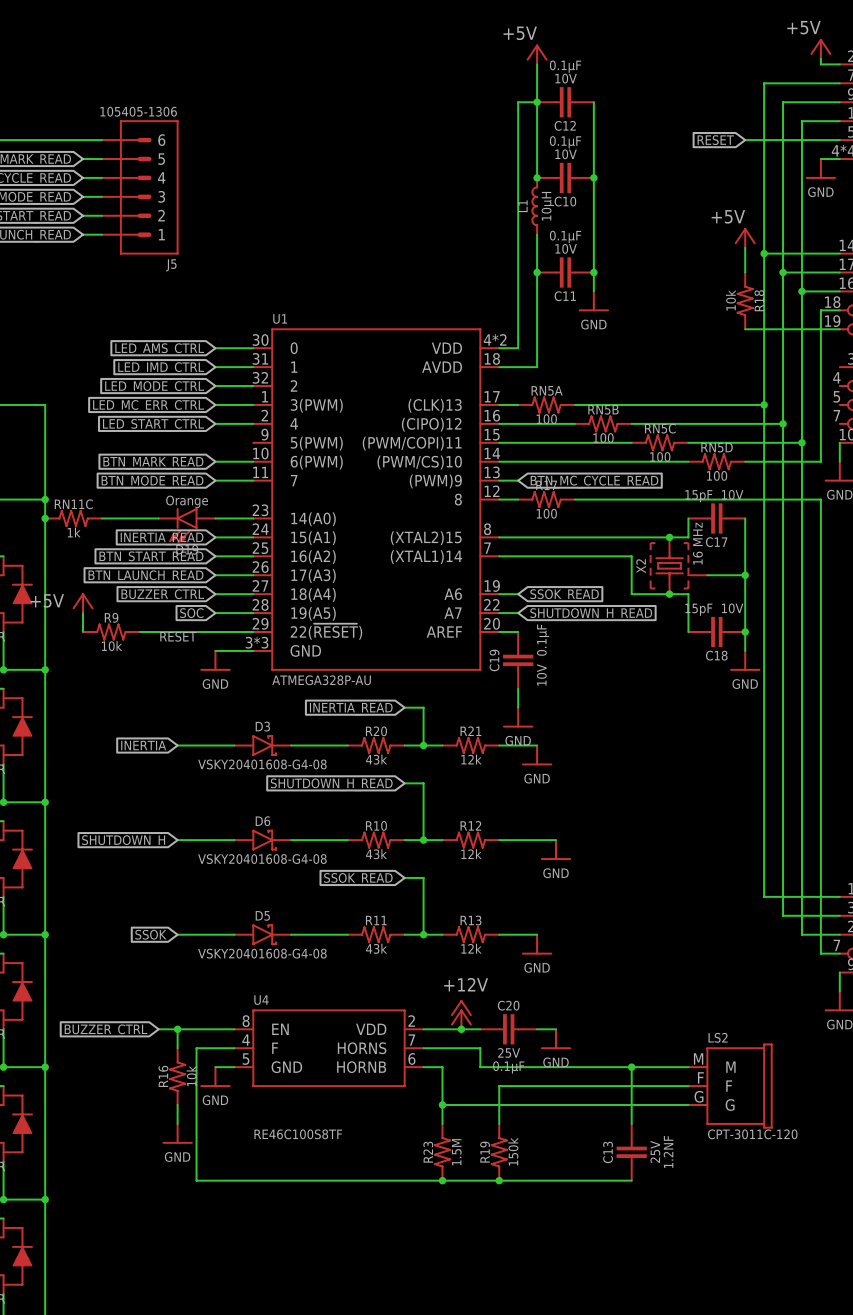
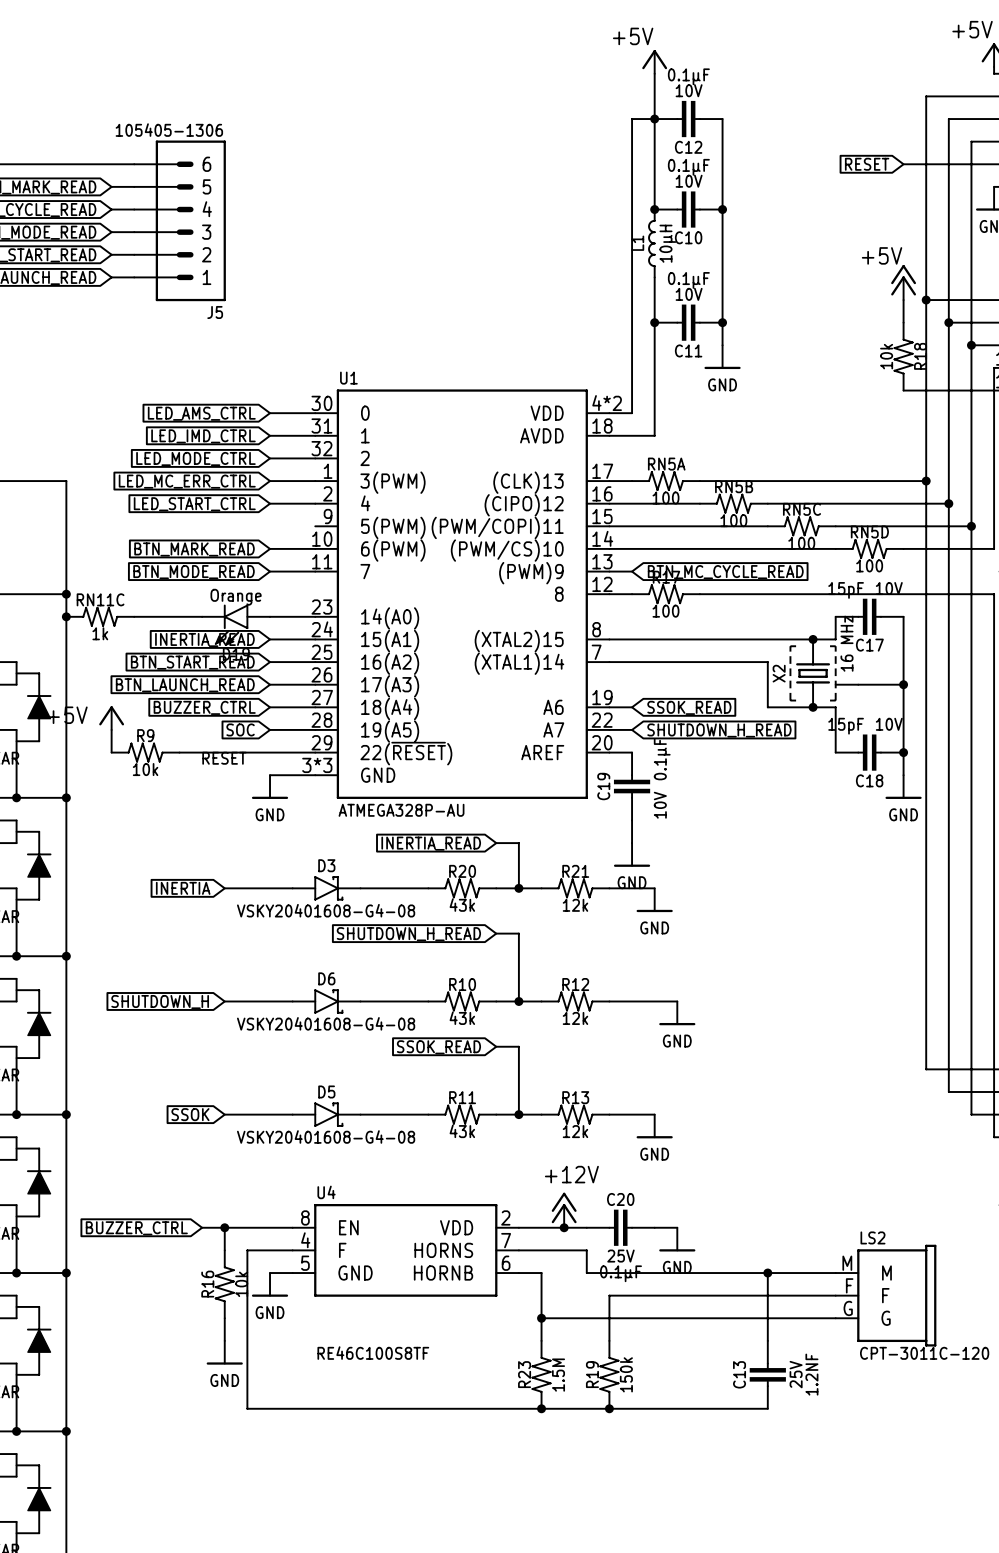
power symbol shape: [734, 228, 756, 248] -> [891, 264, 917, 301]

